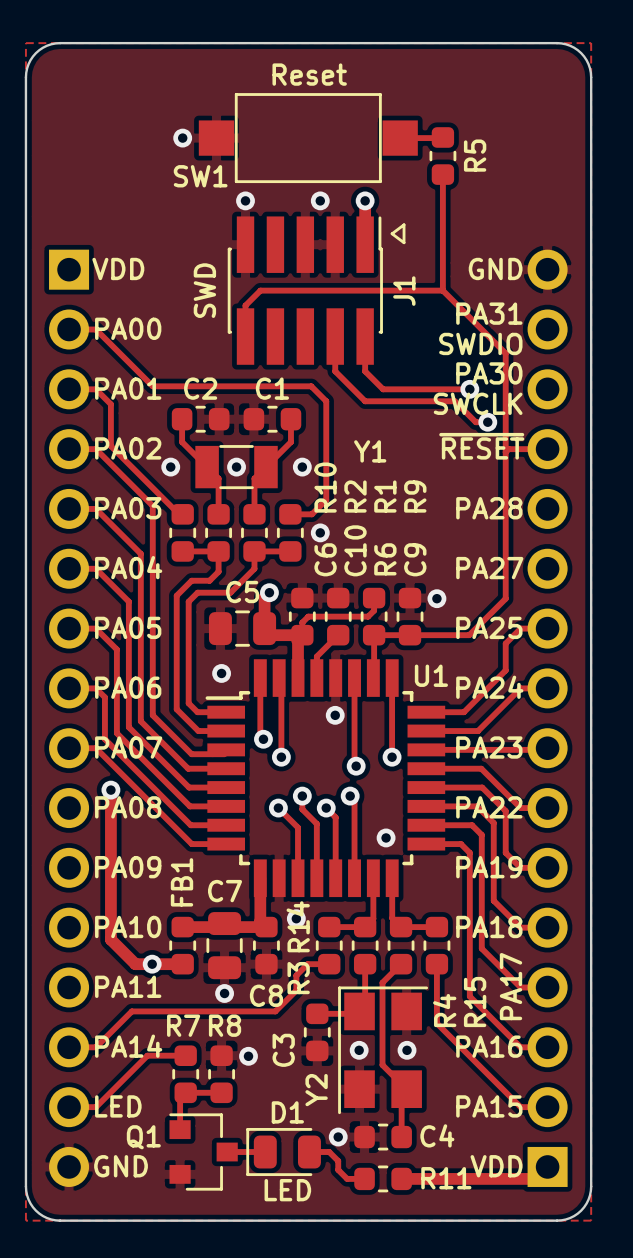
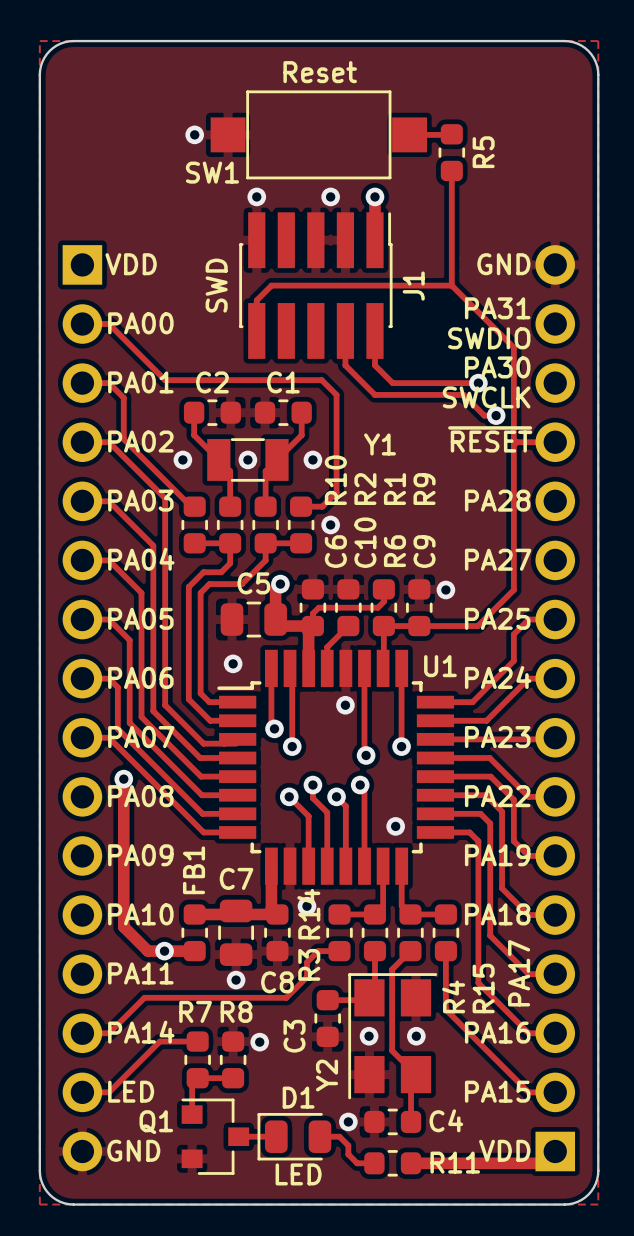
line: (404, 224) (404, 242) (392, 233) (404, 224) -> none

